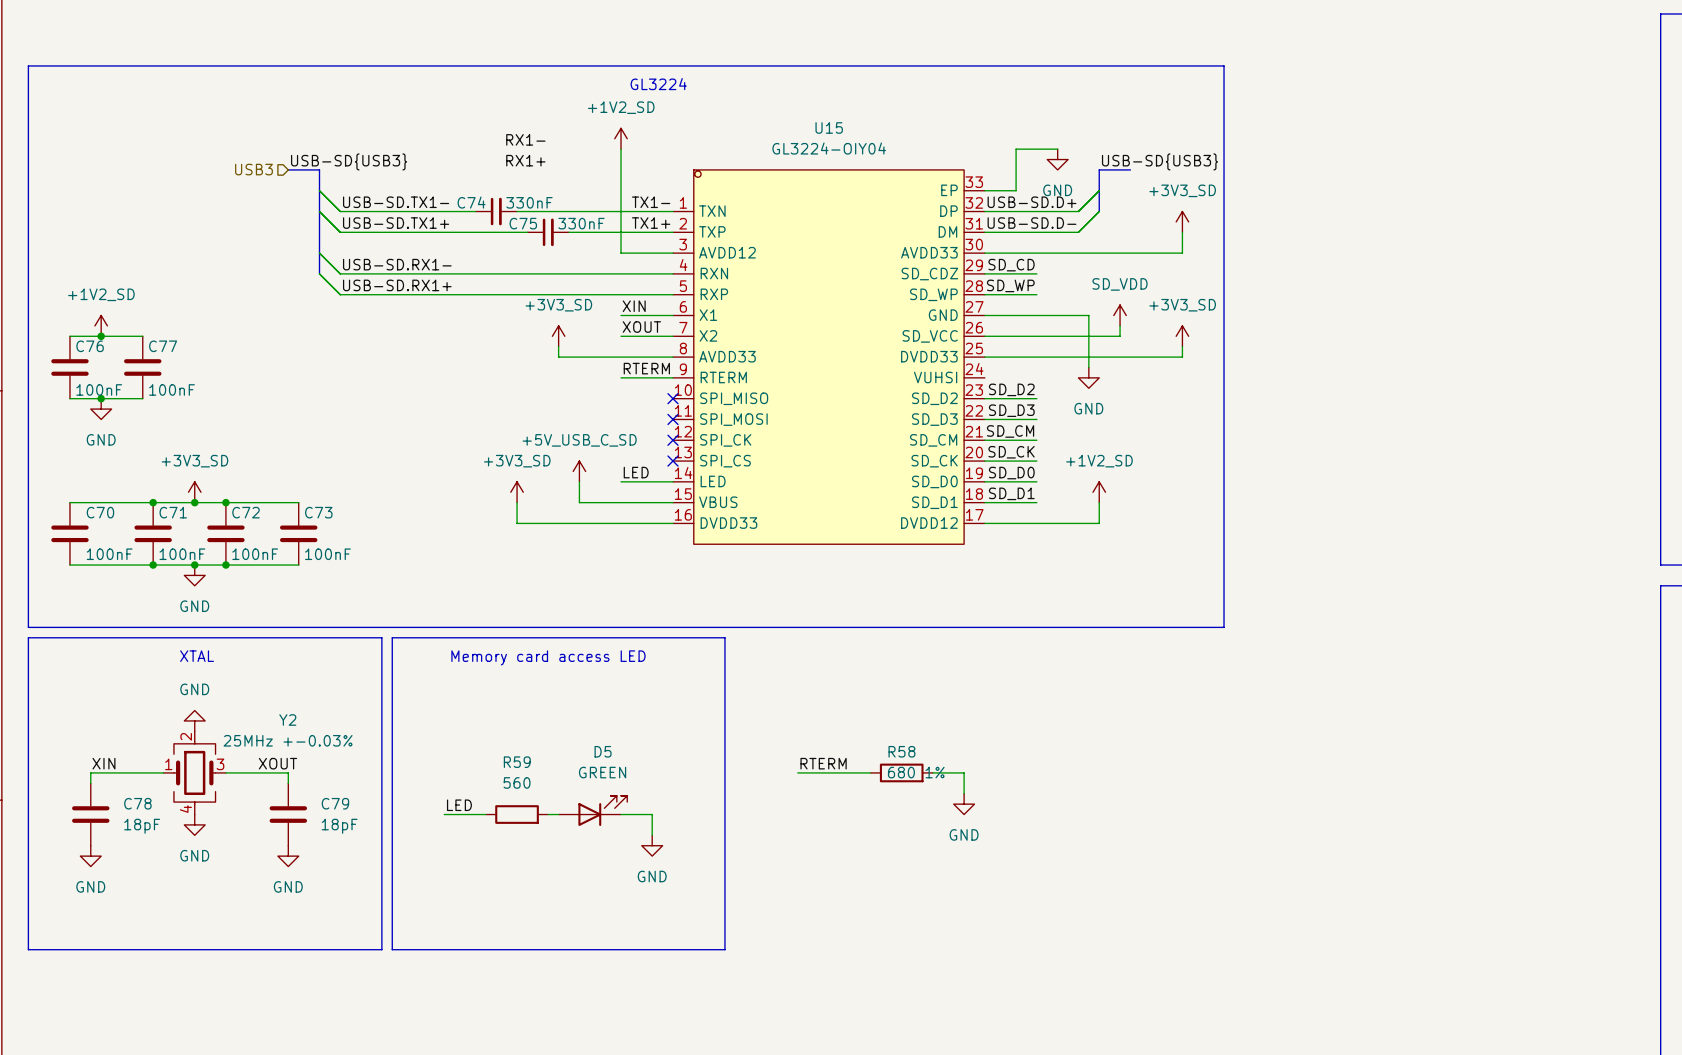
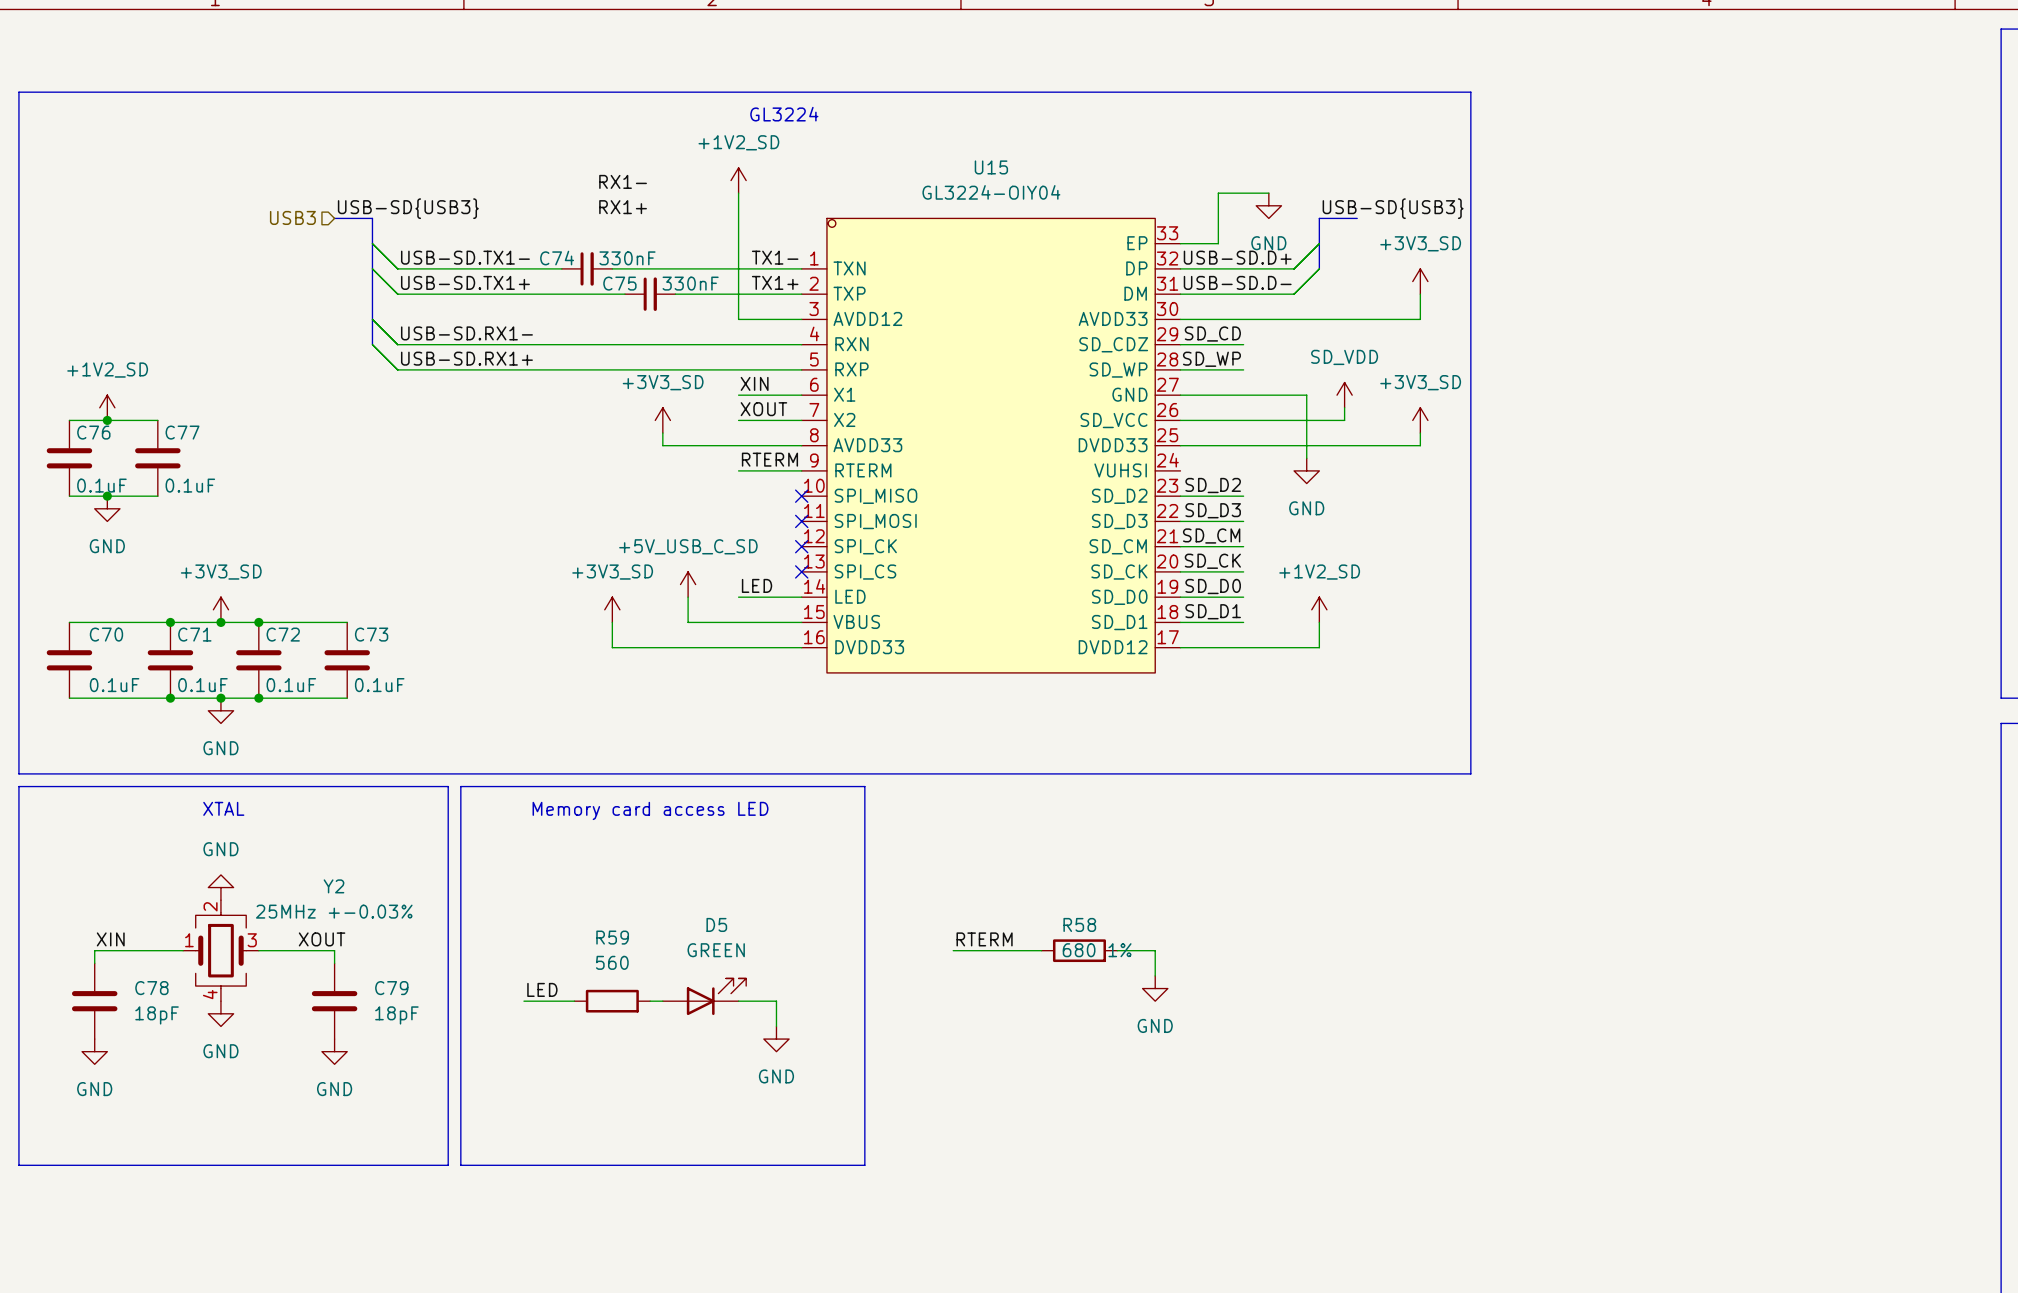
C76 value: 100nF (99, 389) -> 0.1uF (101, 485)
C77 value: 100nF (172, 389) -> 0.1uF (190, 485)
C70 value: 100nF (109, 554) -> 0.1uF (114, 685)
C71 value: 100nF (182, 554) -> 0.1uF (202, 685)
C72 value: 100nF (255, 554) -> 0.1uF (291, 685)
C73 value: 100nF (327, 554) -> 0.1uF (379, 685)

